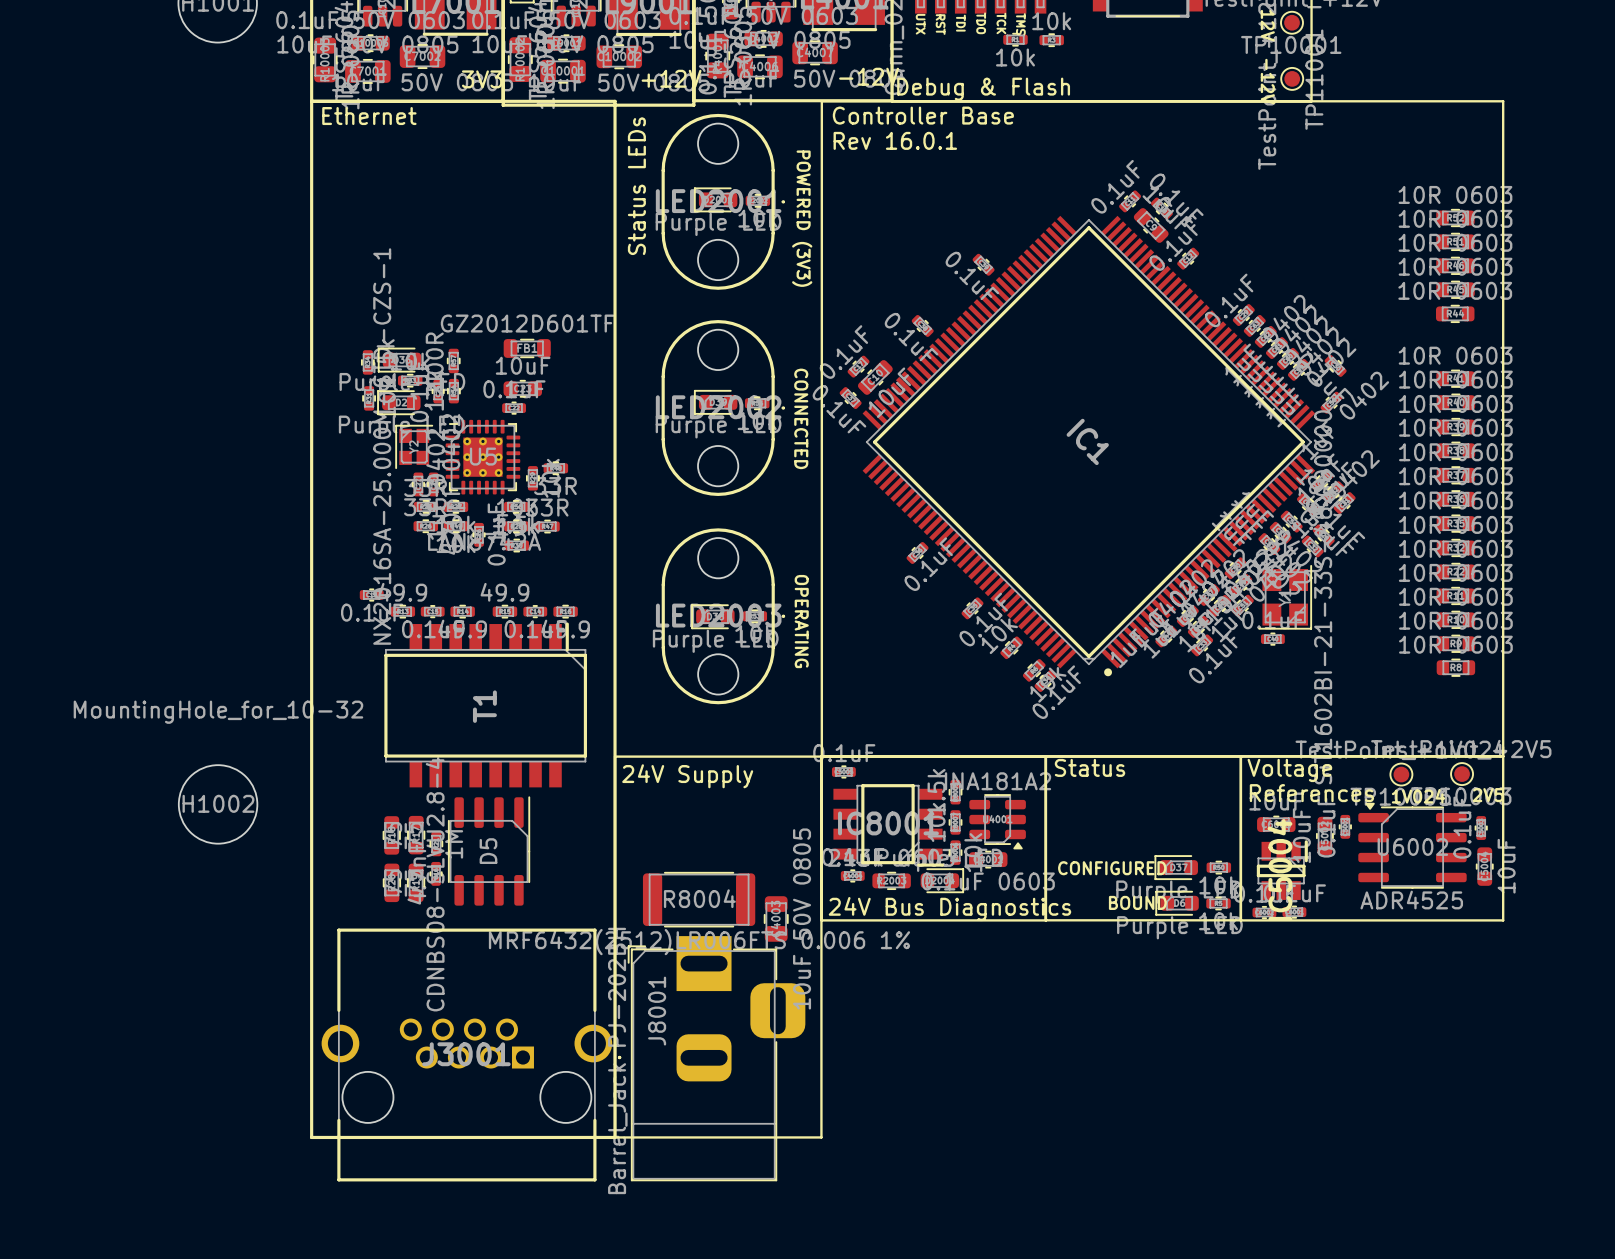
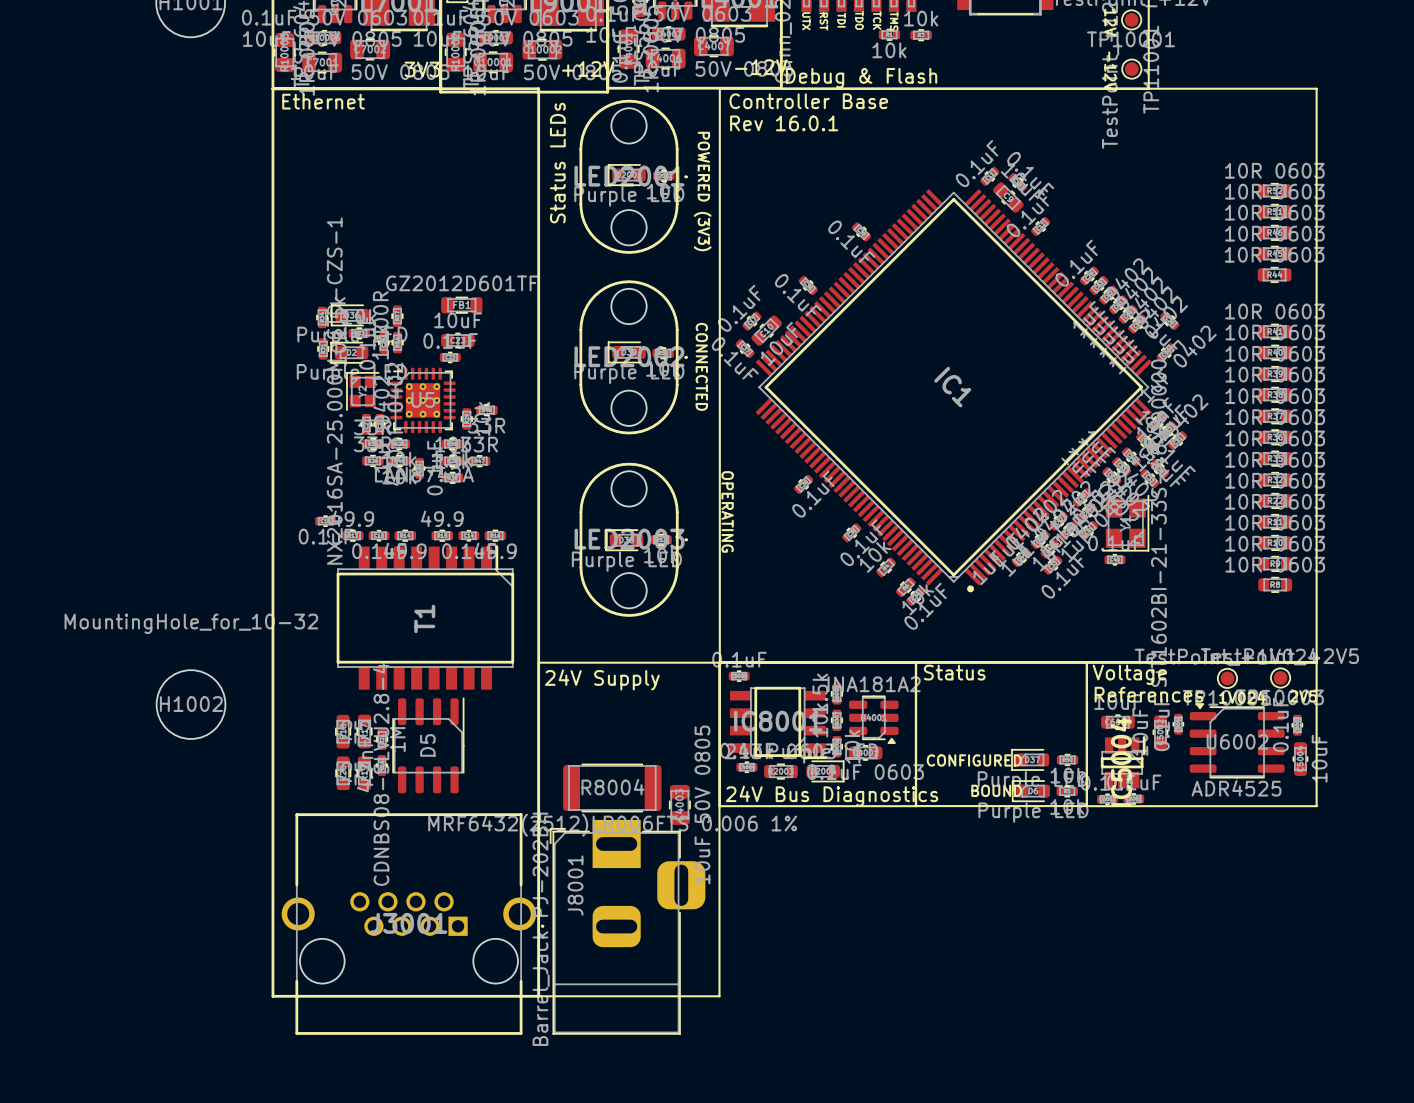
text position: OPERATING (801, 621) -> OPERATING (727, 511)

